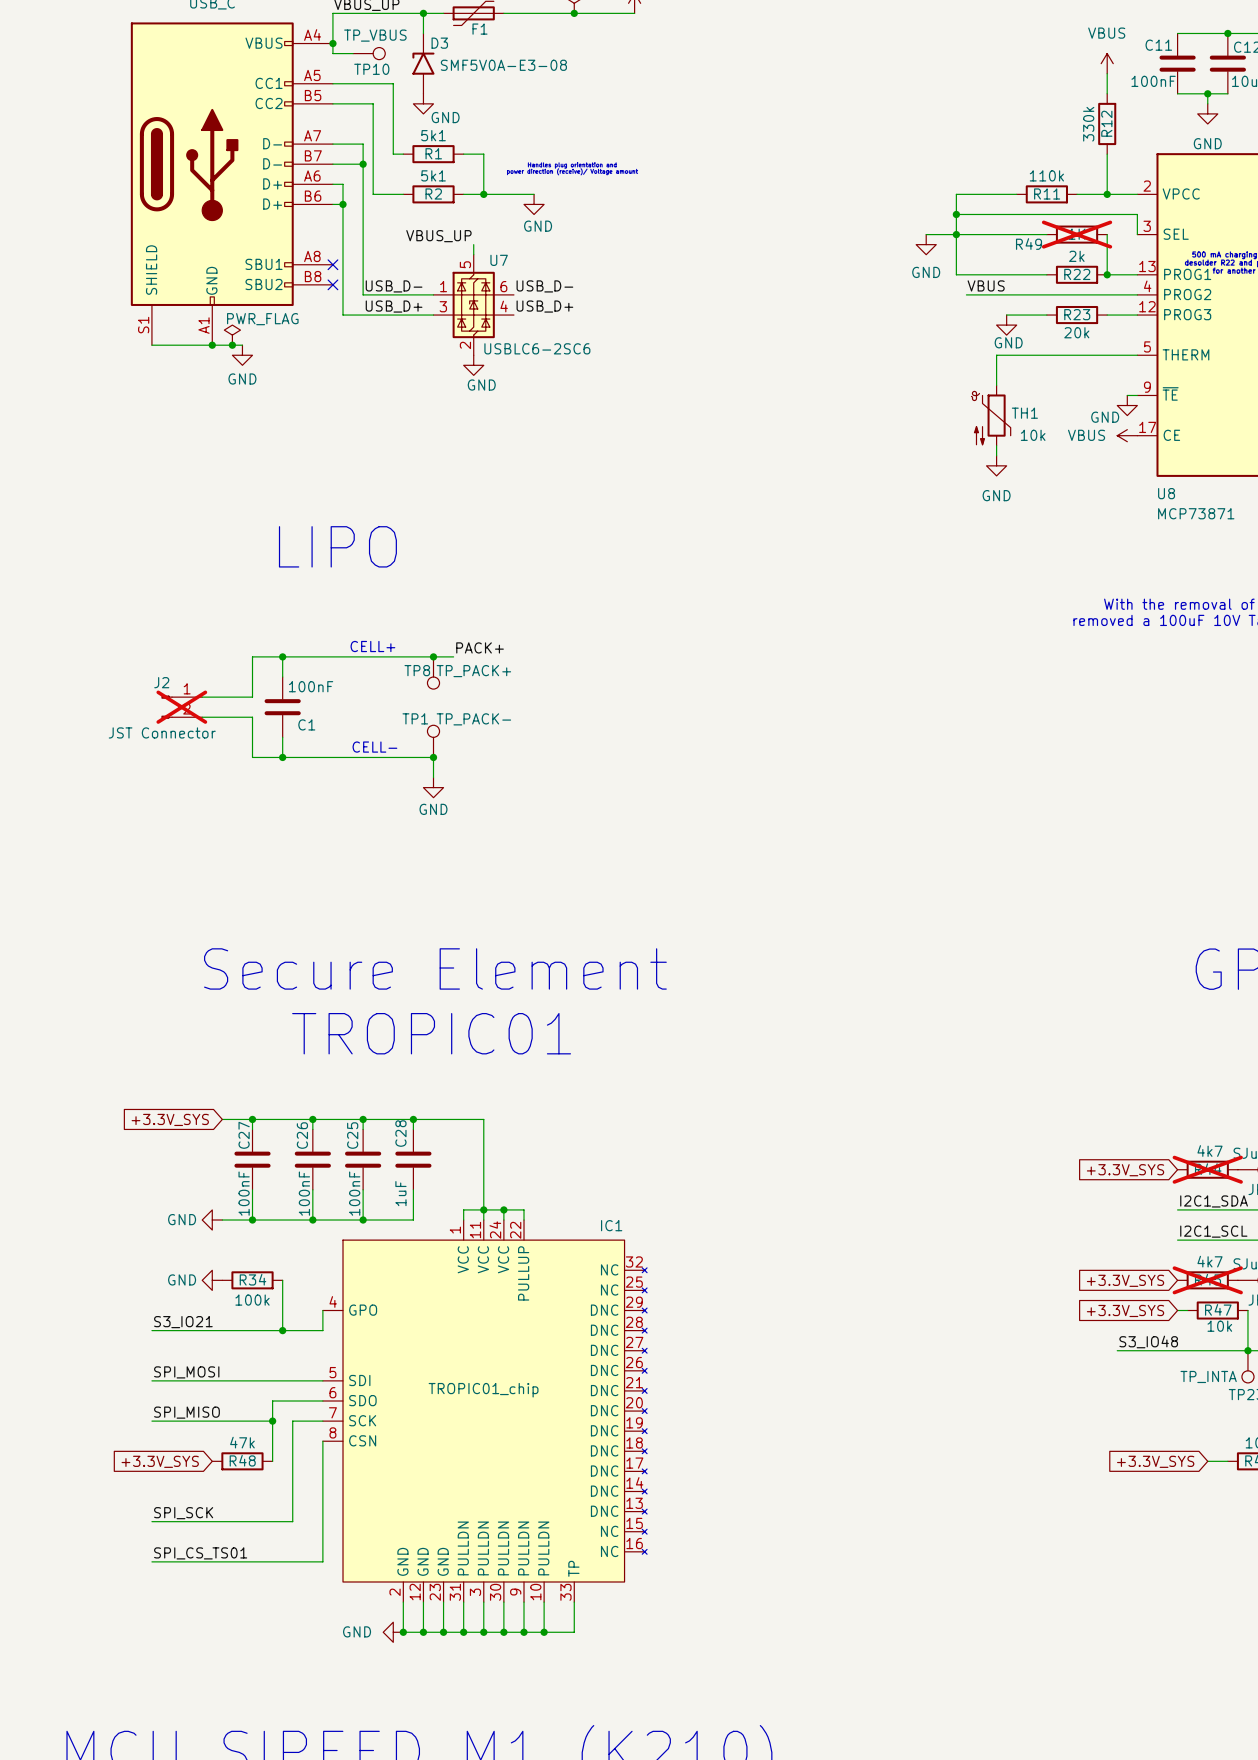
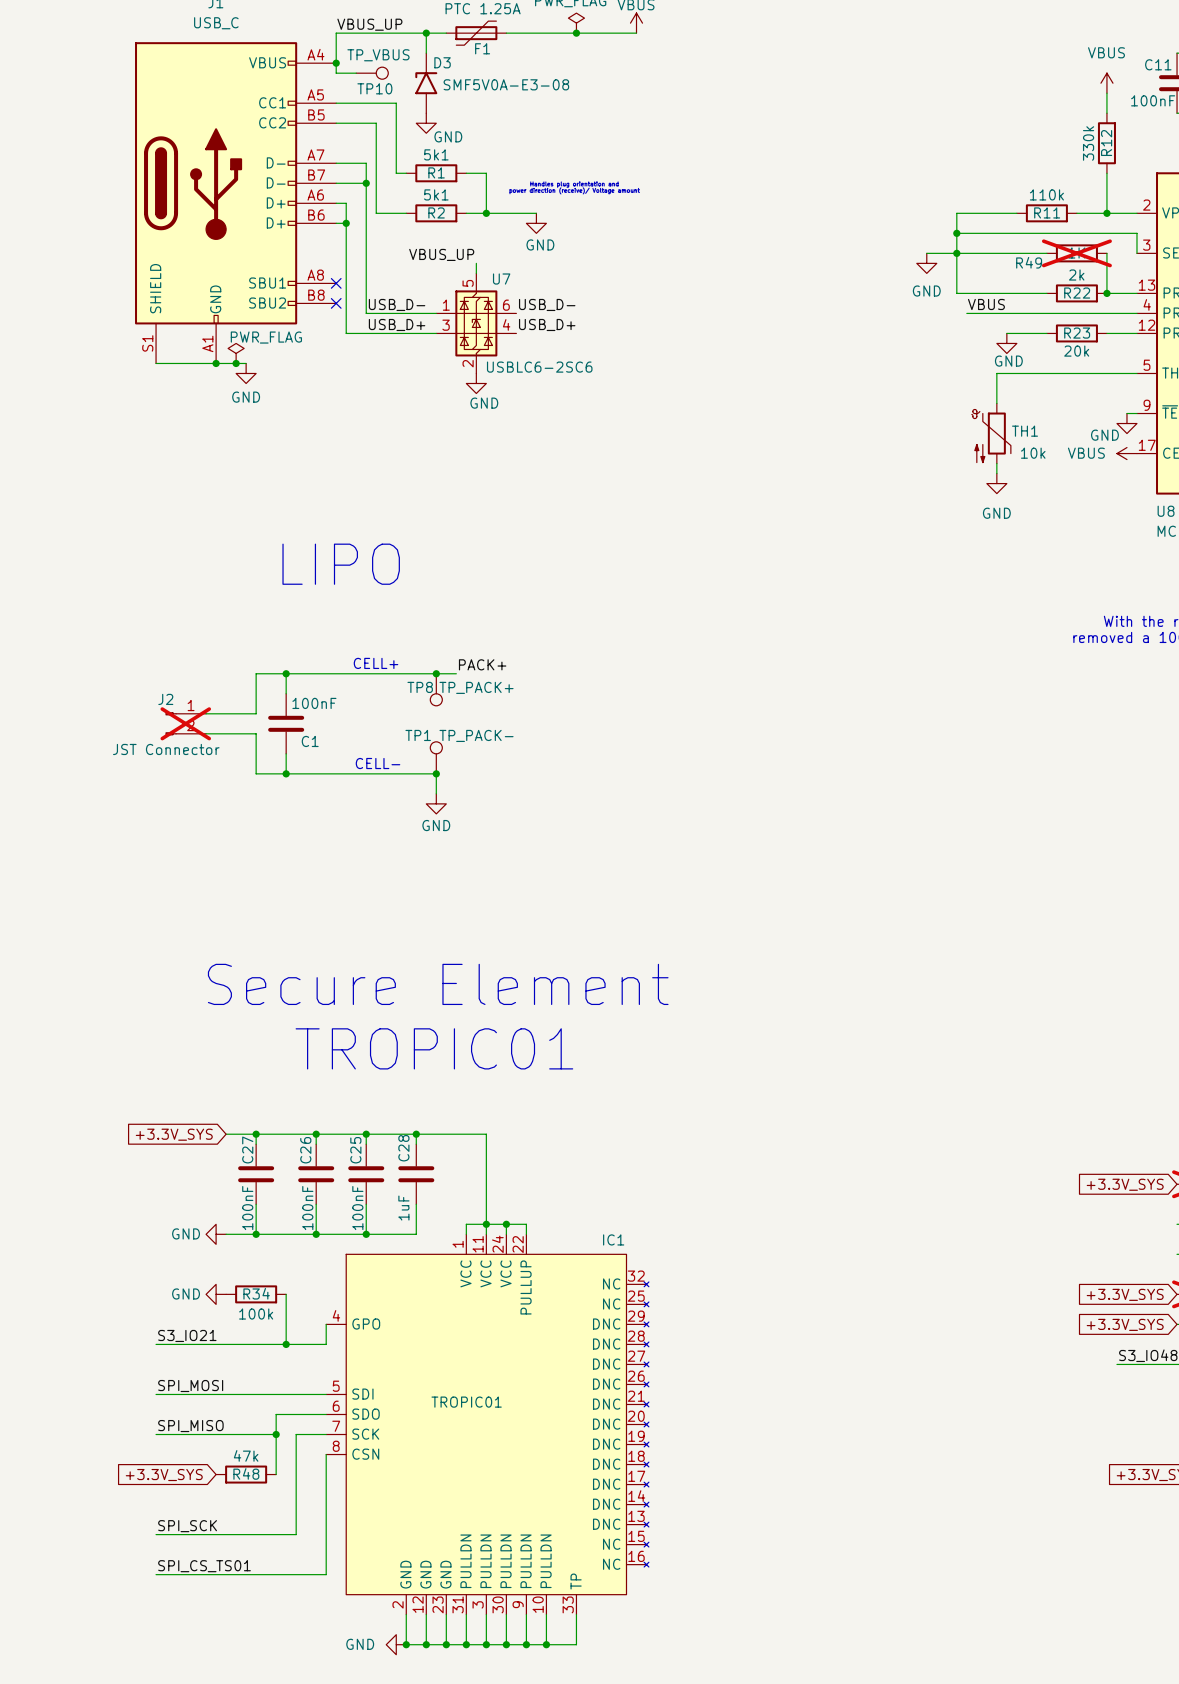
IC1 value: TROPIC01_chip (483, 1390) -> TROPIC01 (466, 1402)

